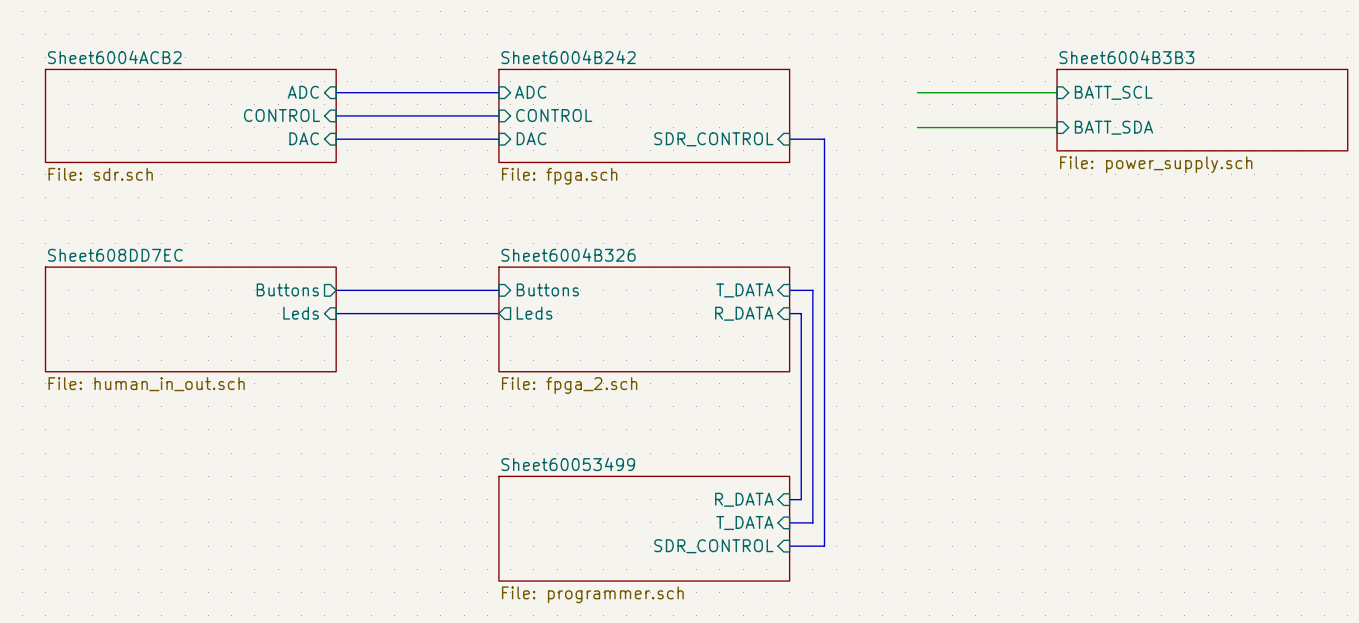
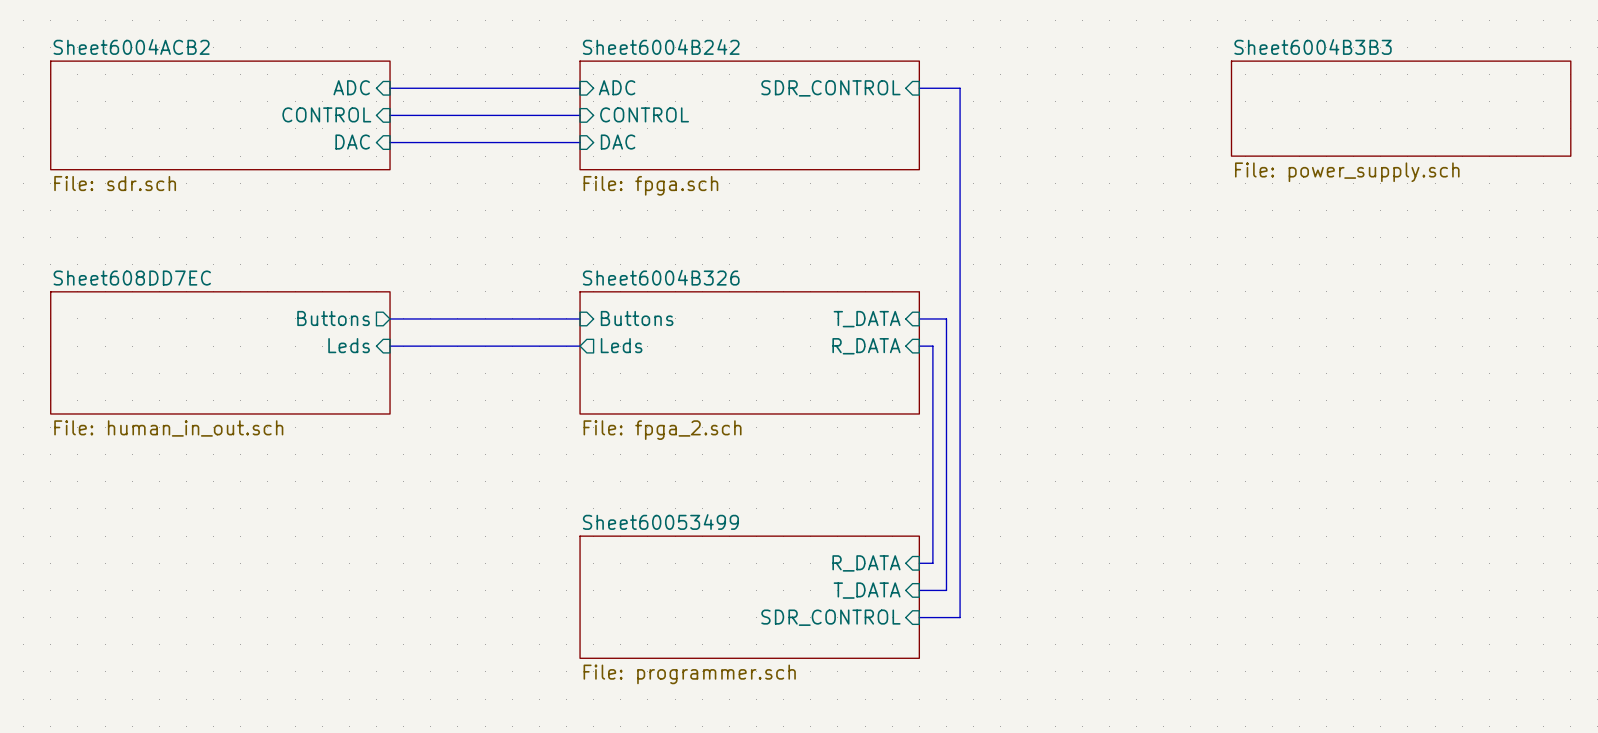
wire: (917, 92) (1057, 92) -> none
sheet pin: BATT_SCL (1113, 92) -> none
wire: (917, 127) (1057, 127) -> none
sheet pin: BATT_SDA (1113, 127) -> none
sheet pin position: SDR_CONTROL (713, 139) -> SDR_CONTROL (830, 88)
bus: (789, 139) (824, 139) -> (919, 88) (960, 88) (960, 142)

